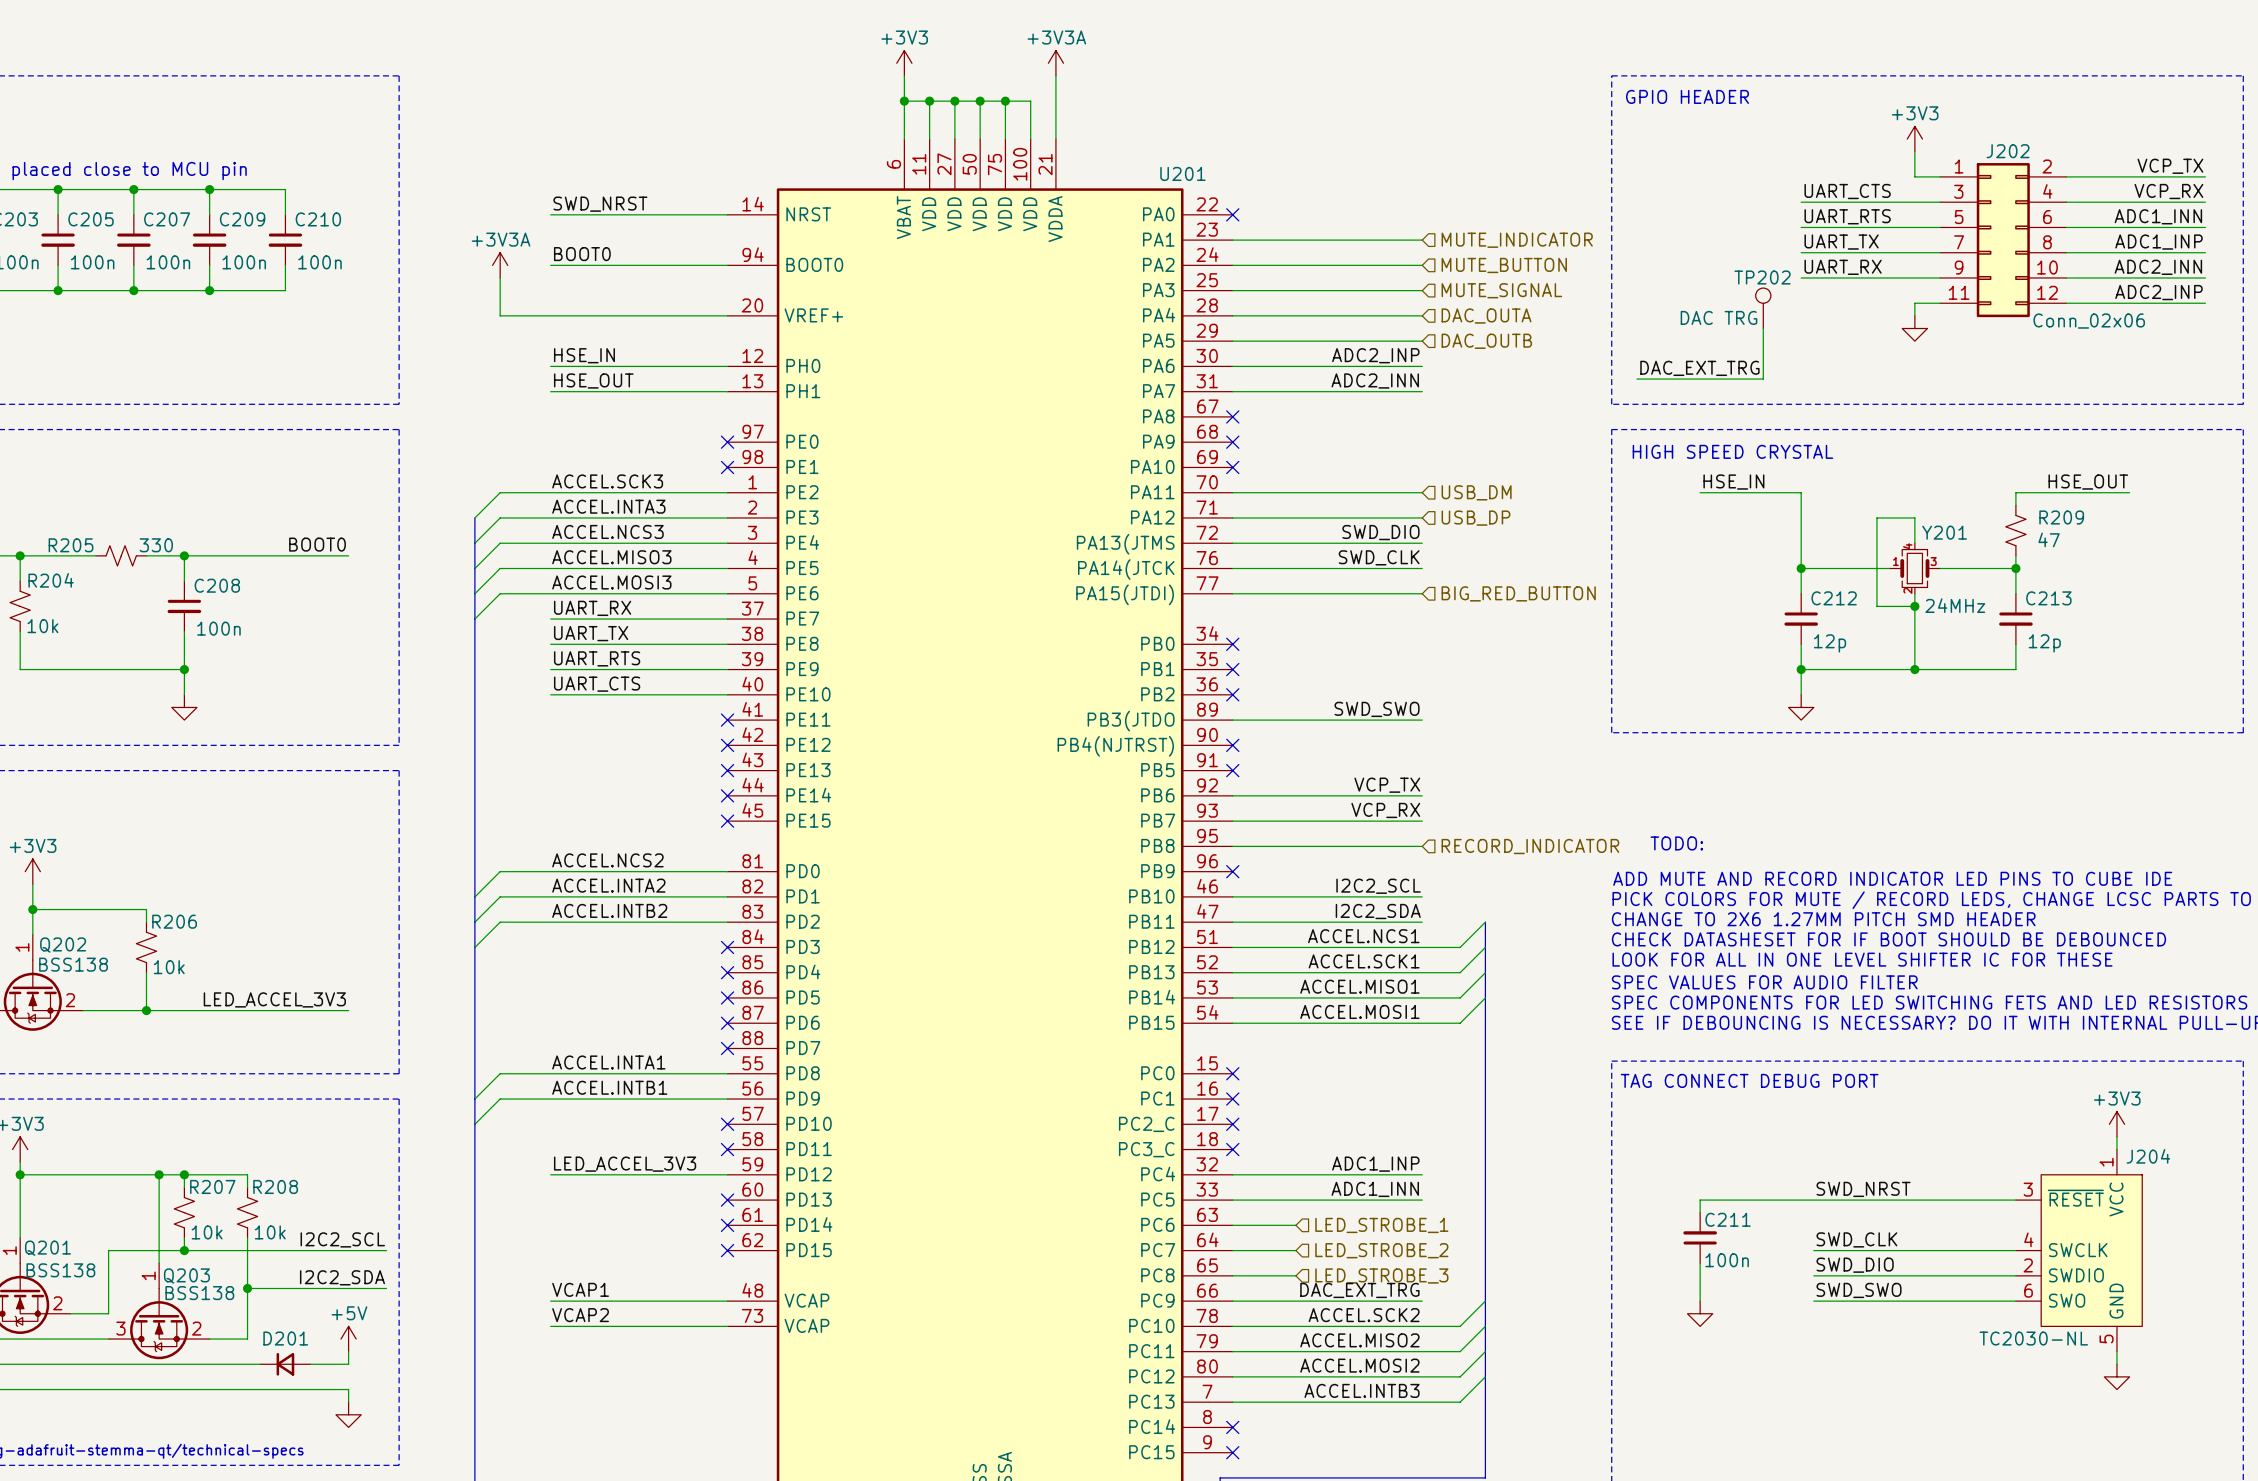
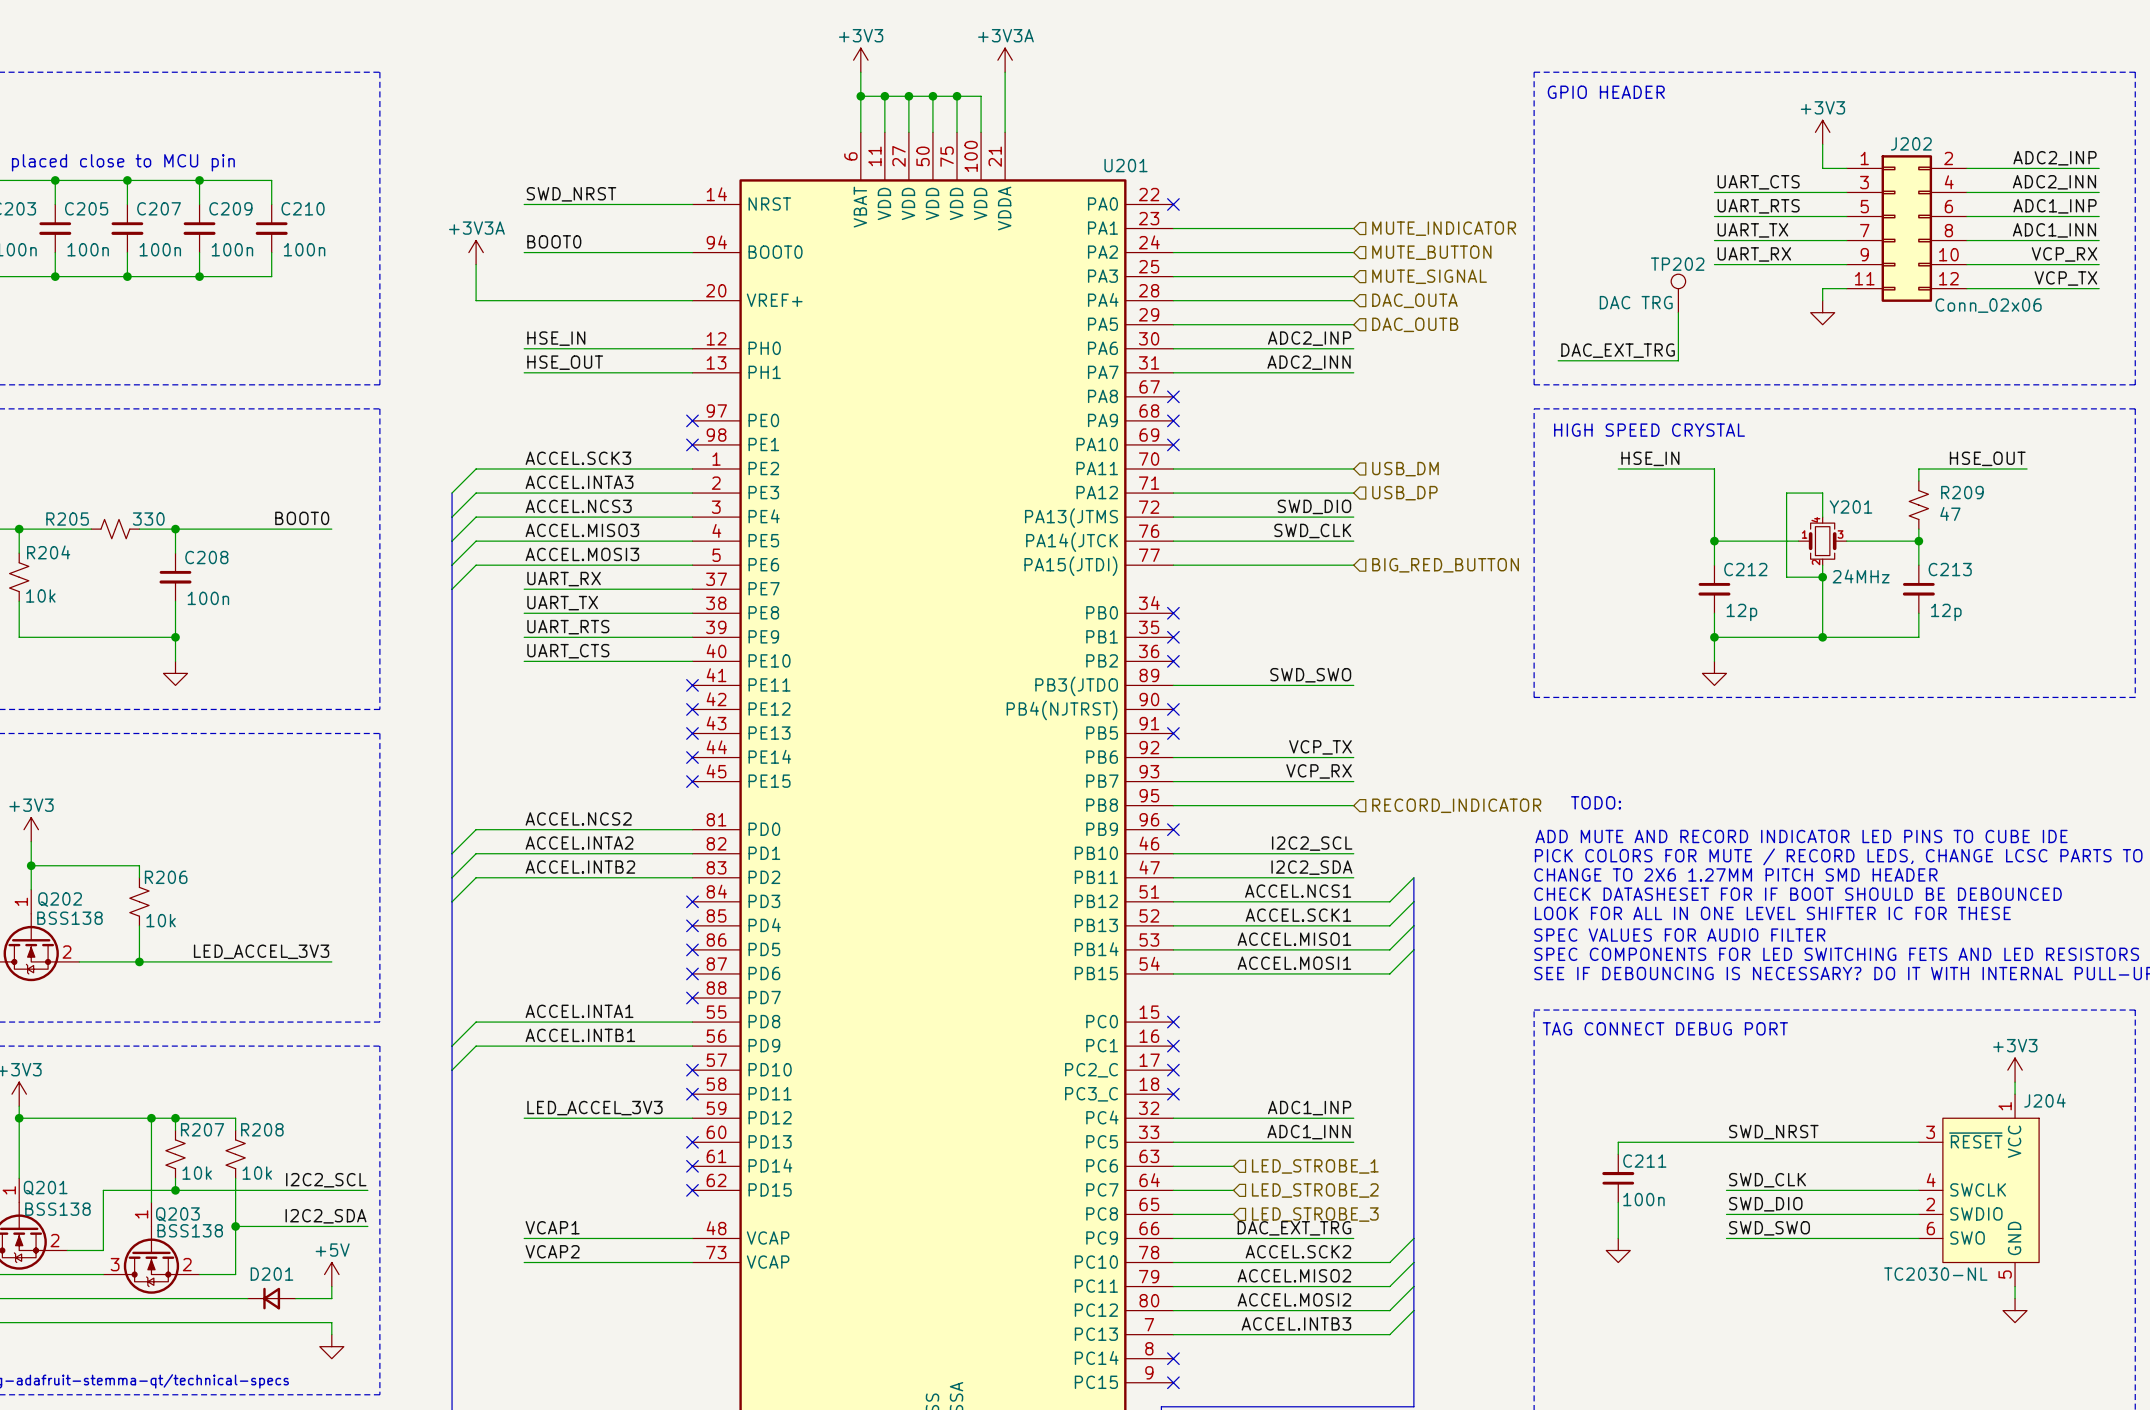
label: VCP_TX (2170, 166) -> ADC2_INP (2055, 158)
label: VCP_RX (2168, 191) -> ADC2_INN (2054, 182)
label: ADC1_INN (2158, 216) -> ADC1_INP (2055, 206)
label: ADC1_INP (2158, 242) -> ADC1_INN (2054, 230)
label: ADC2_INN (2158, 267) -> VCP_RX (2064, 254)
label: ADC2_INP (2158, 292) -> VCP_TX (2065, 278)

